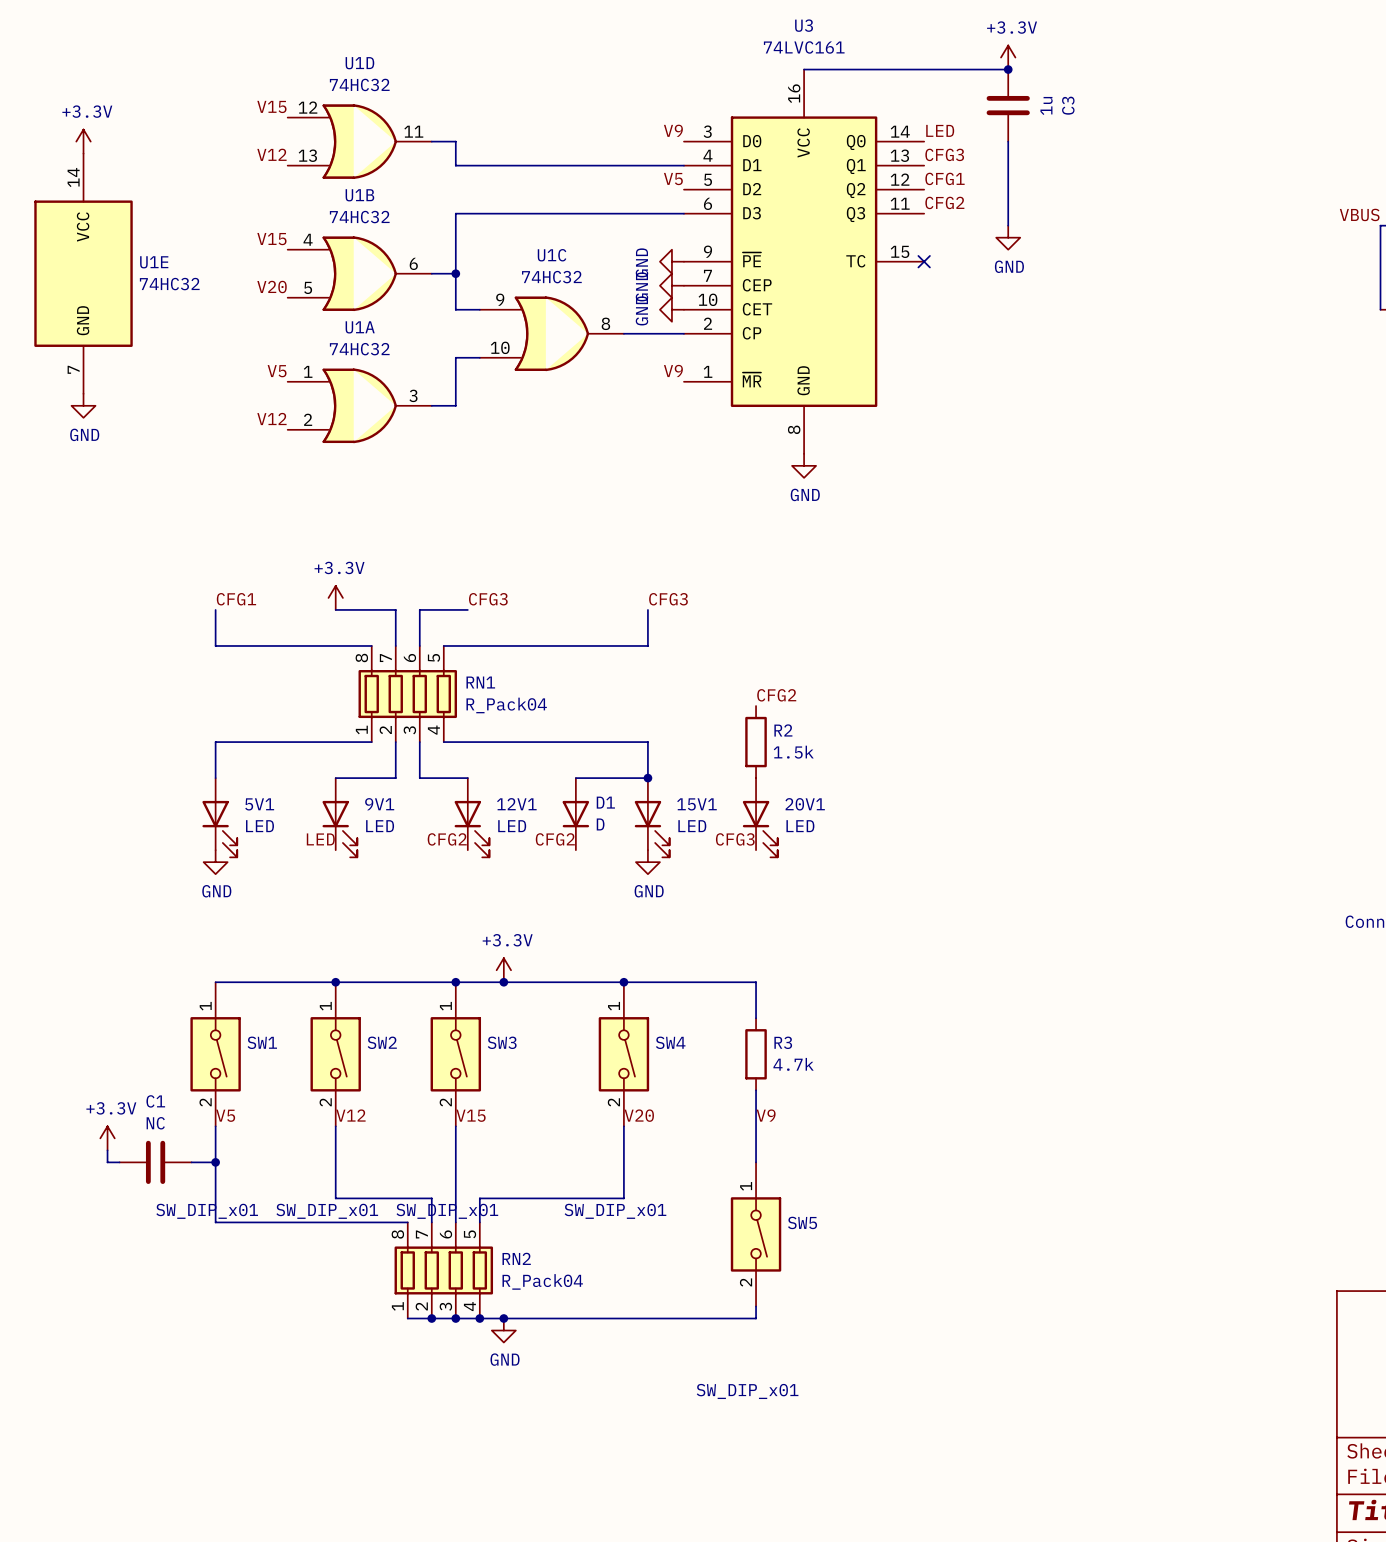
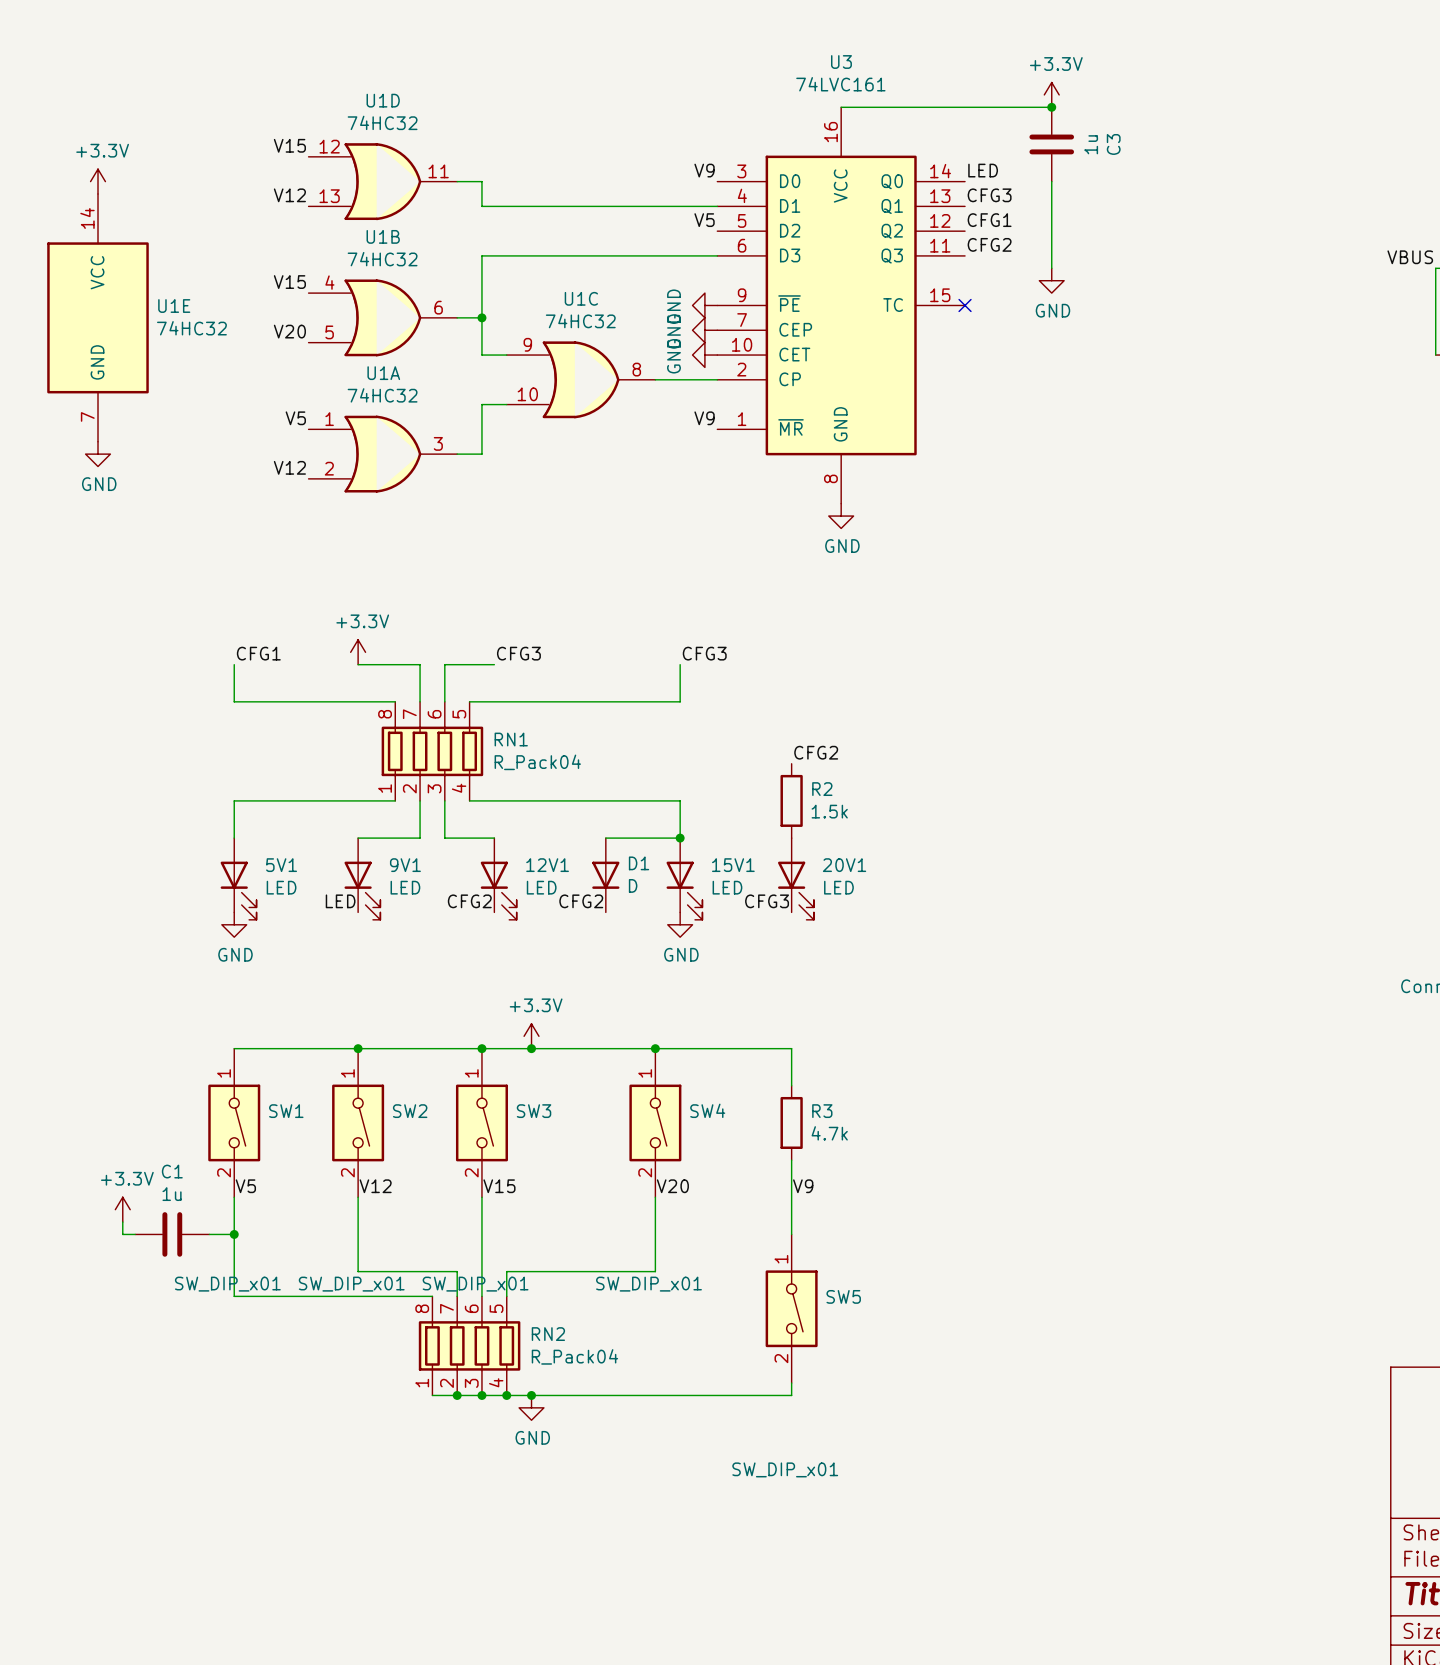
C1 value: NC (155, 1123) -> 1u (172, 1194)

